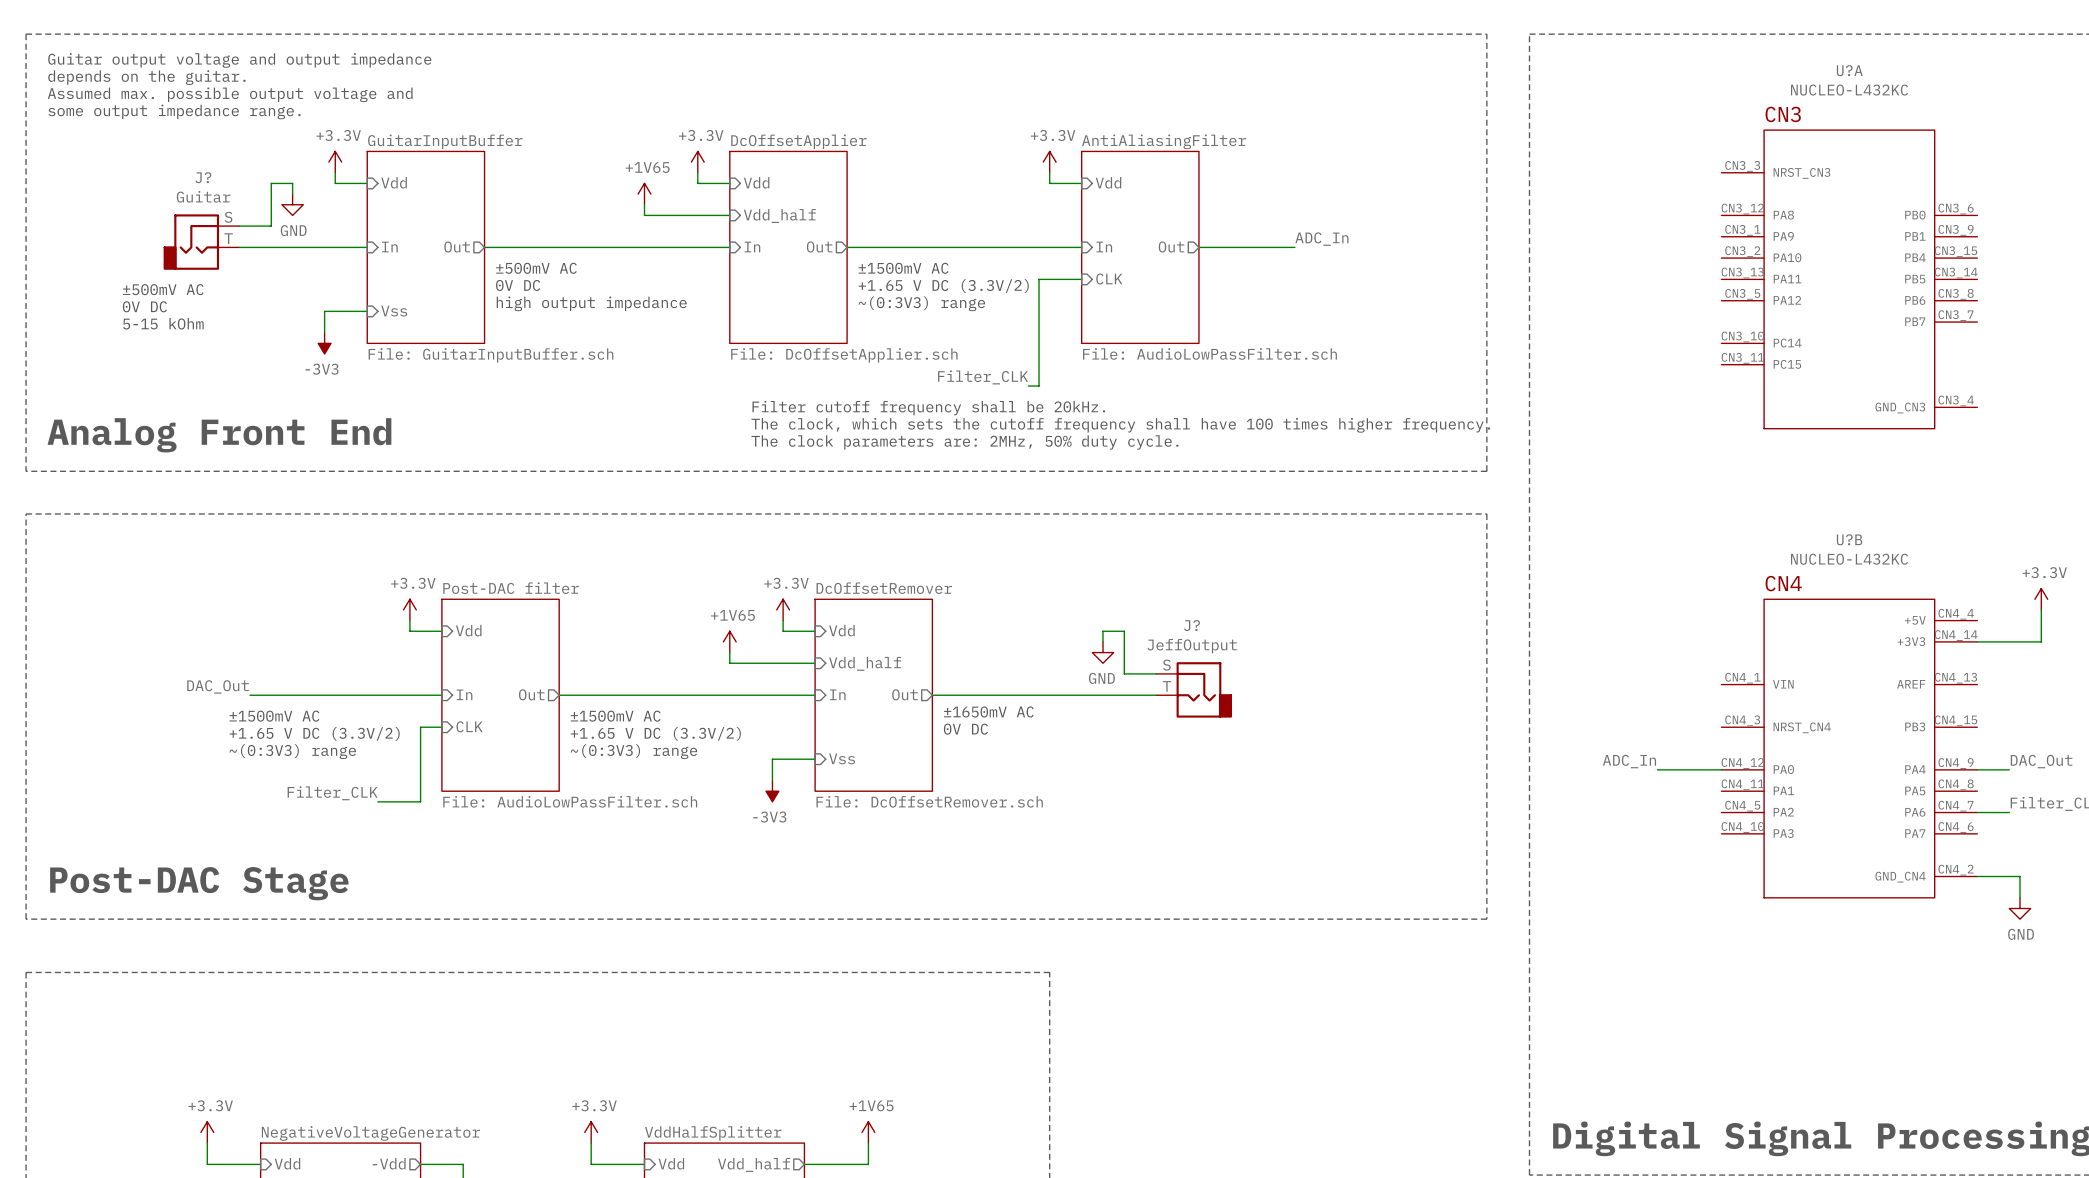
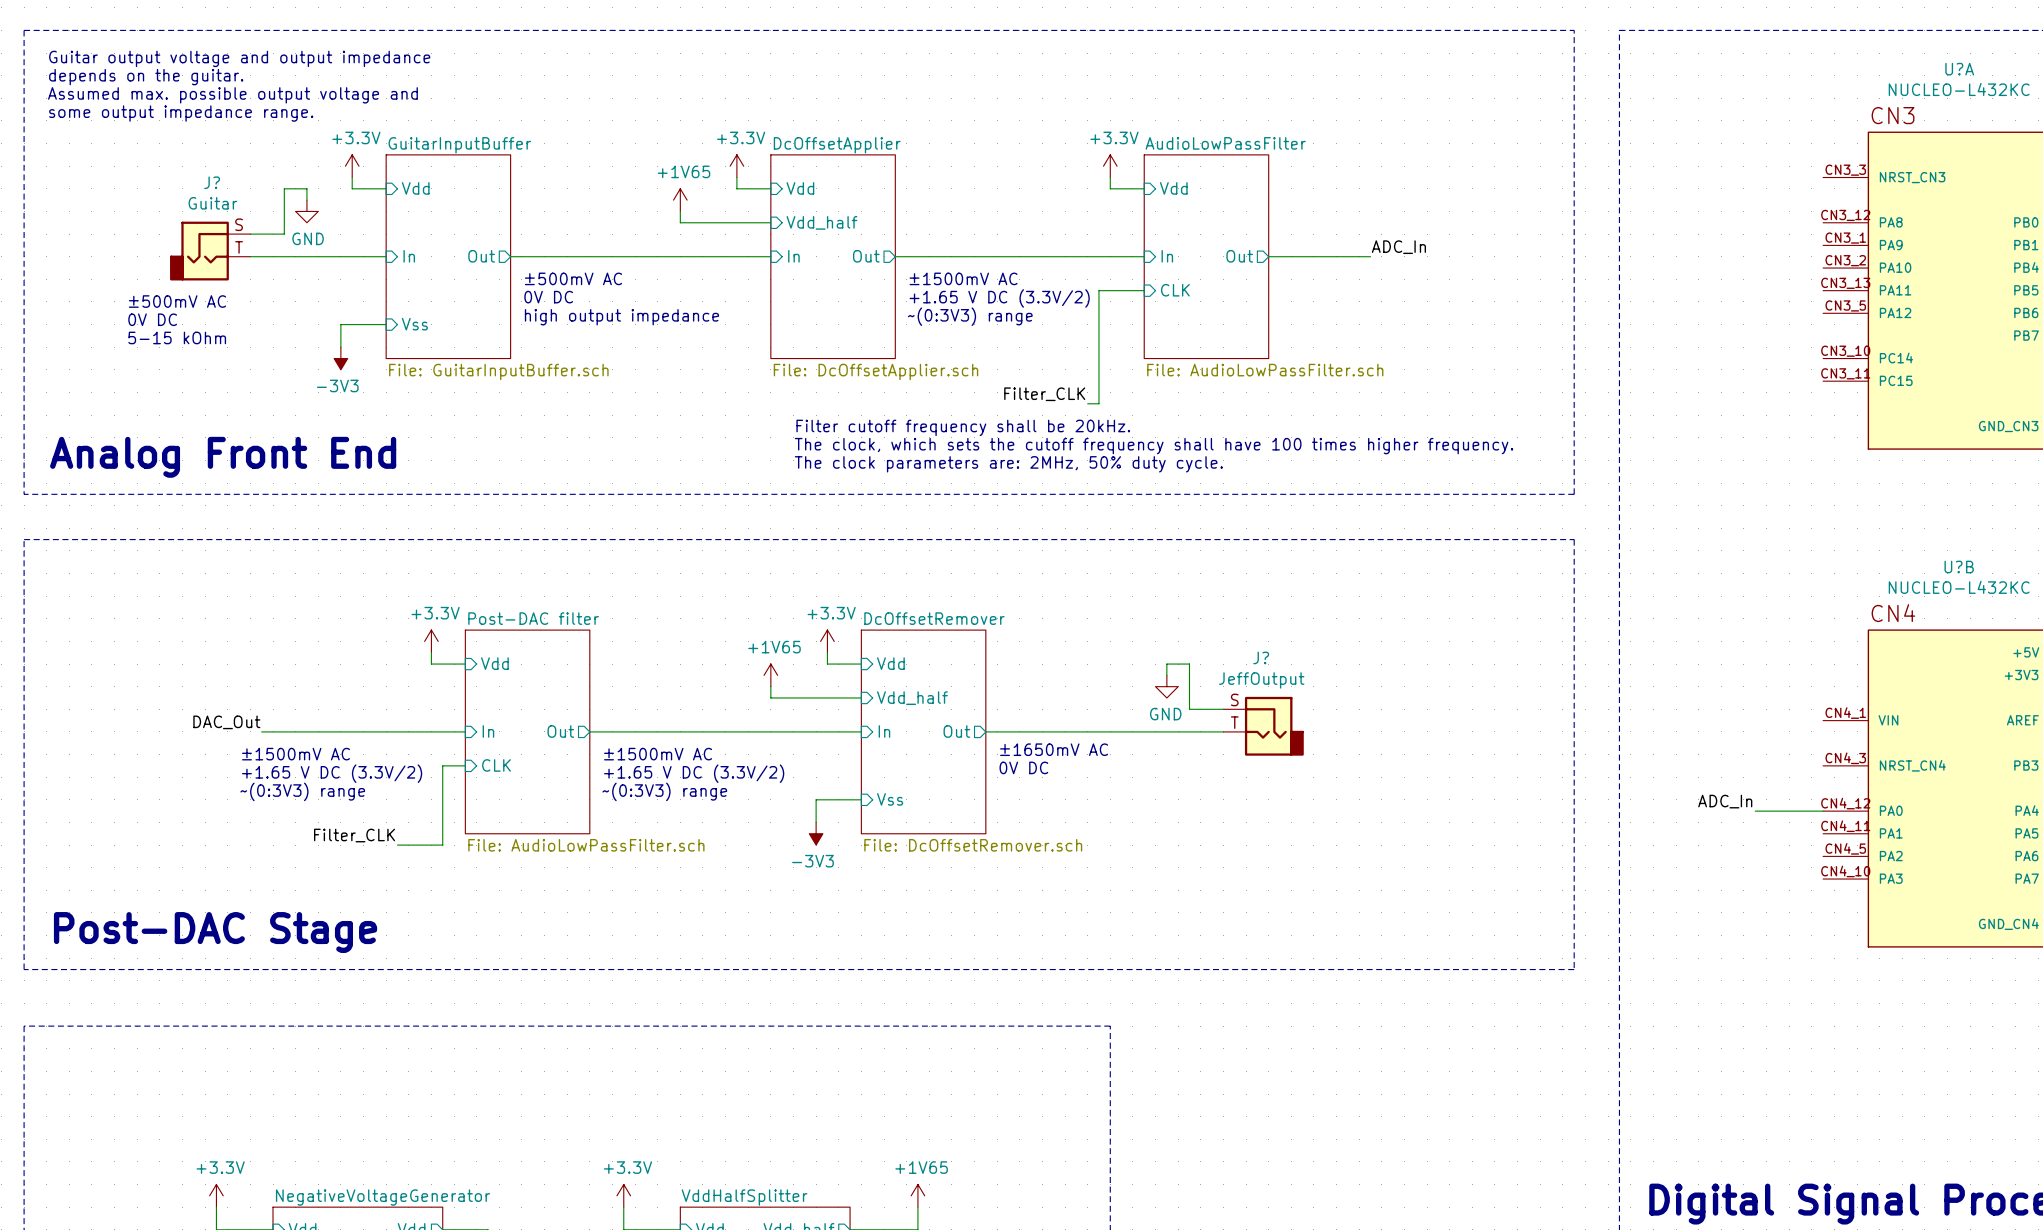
sheet AntiAliasingFilter name: AntiAliasingFilter (1164, 141) -> AudioLowPassFilter (1225, 143)

